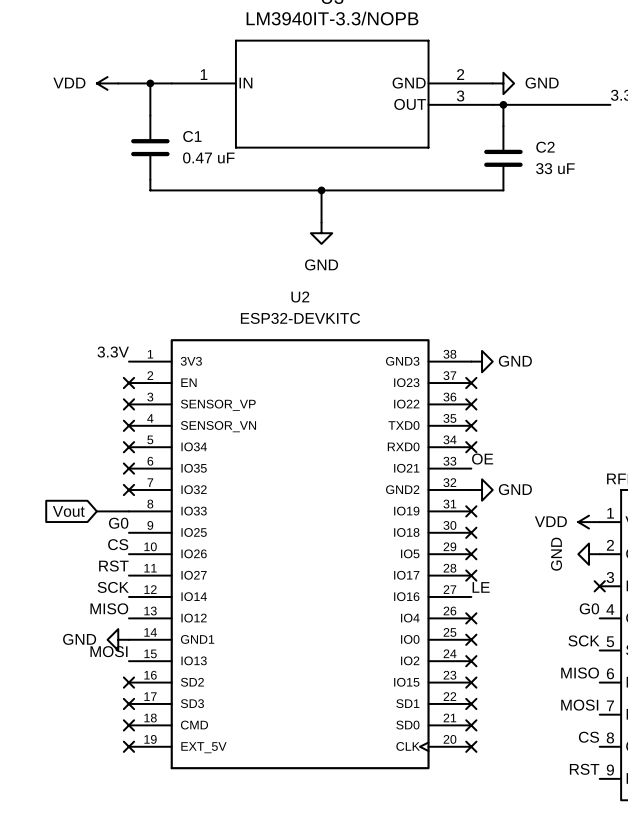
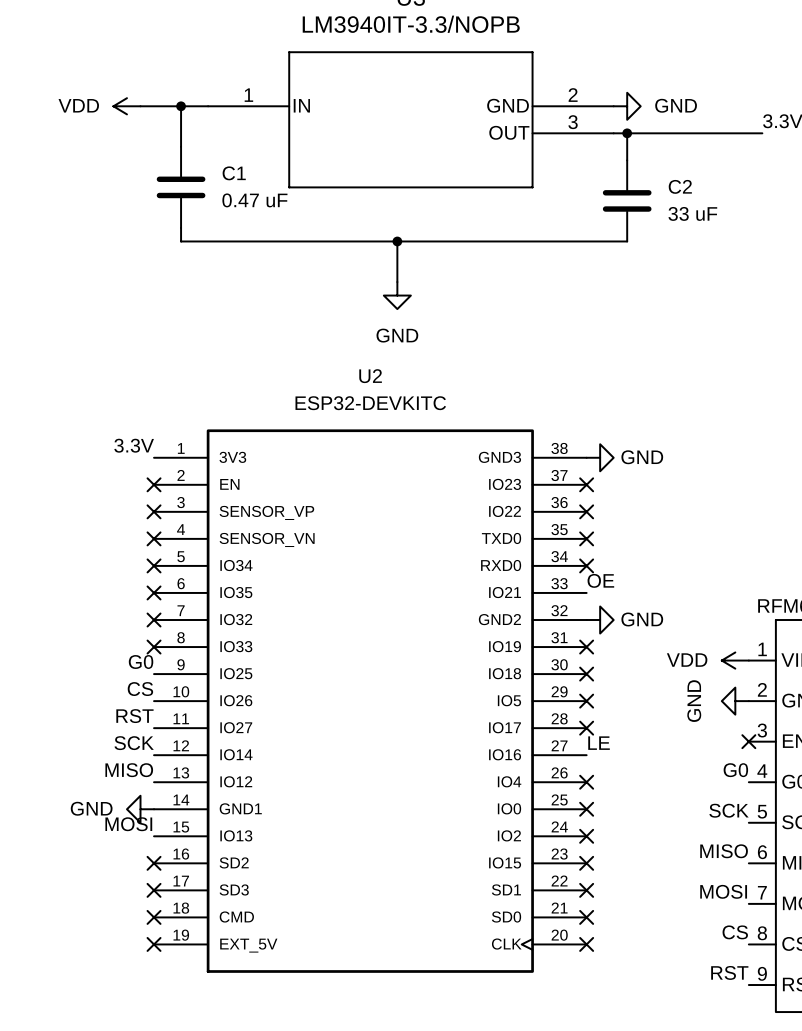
global label: Vout (68, 511) -> none
wire: (96, 511) (128, 511) -> none
no-connect mark: none -> (154, 647)

